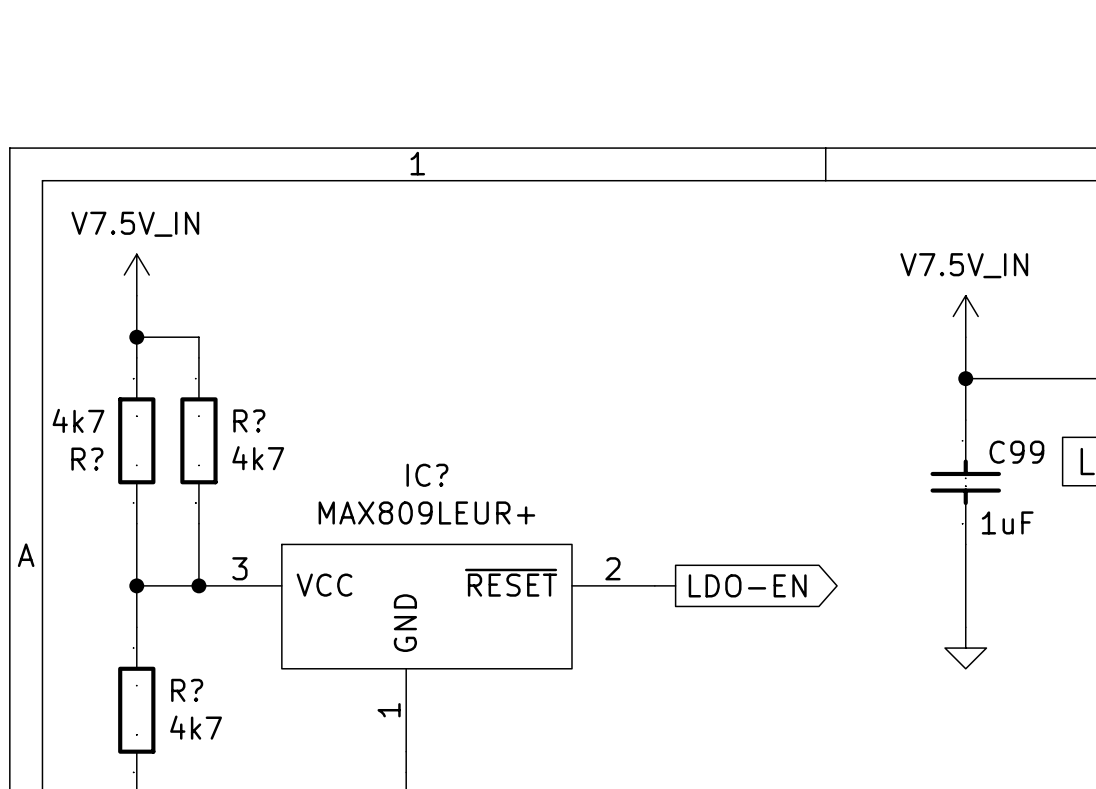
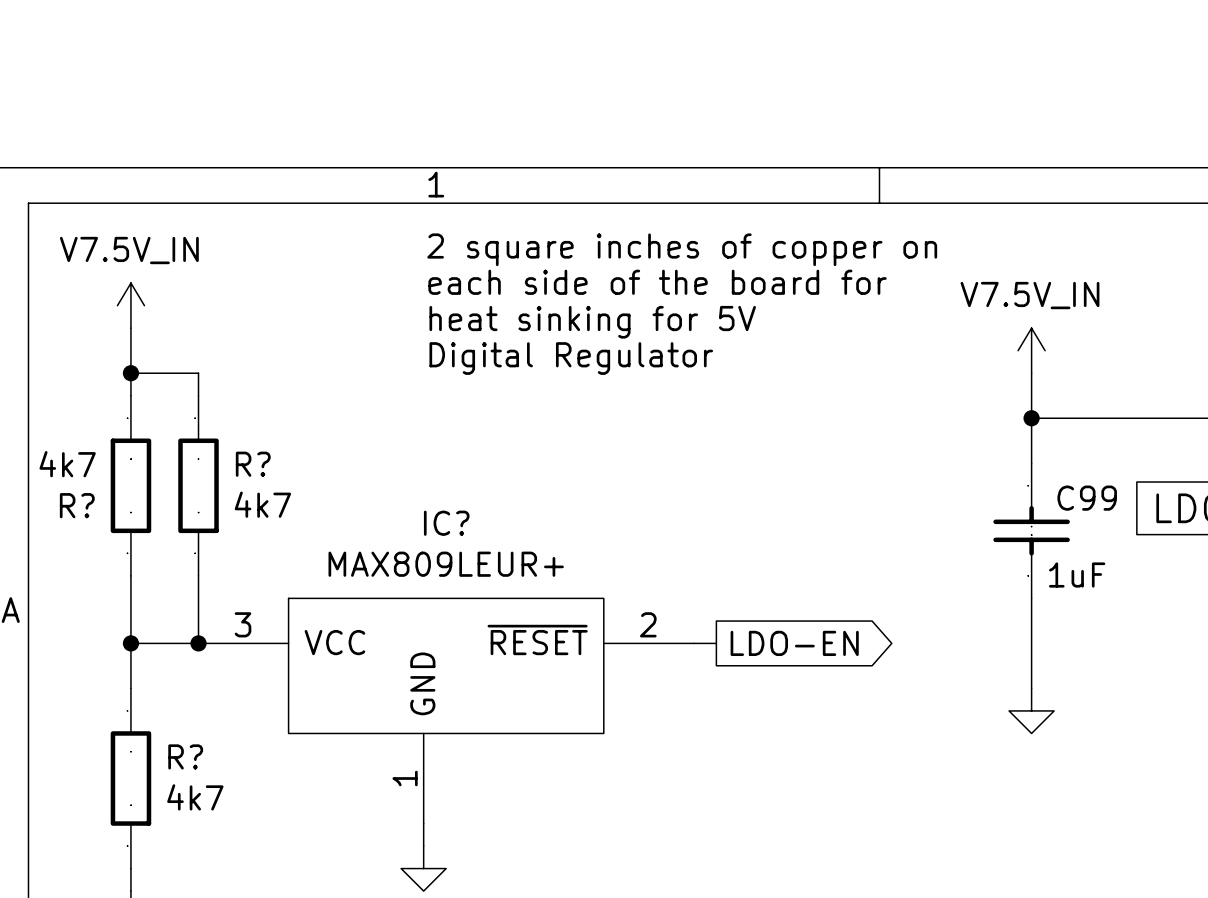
text: none -> 2 square inches of copper on (682, 249)
text: none -> each side of the board for (657, 282)
text: none -> heat sinking for 5V (592, 322)
text: none -> Digital Regulator (571, 358)

